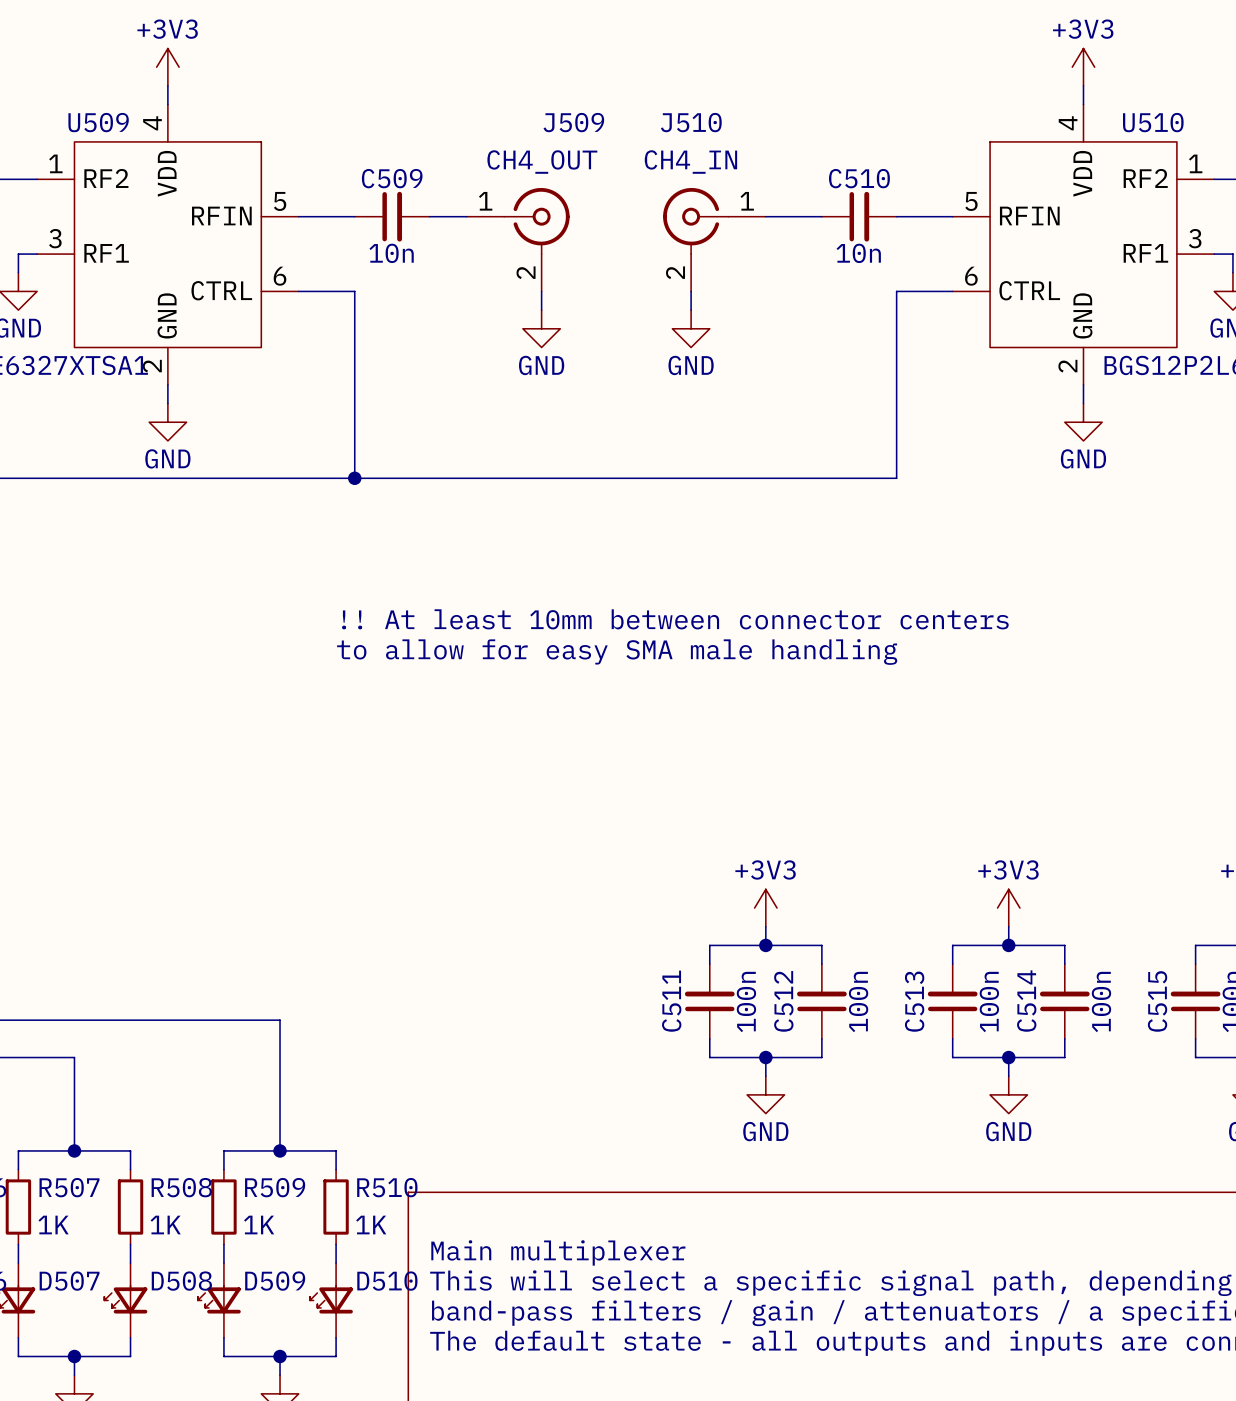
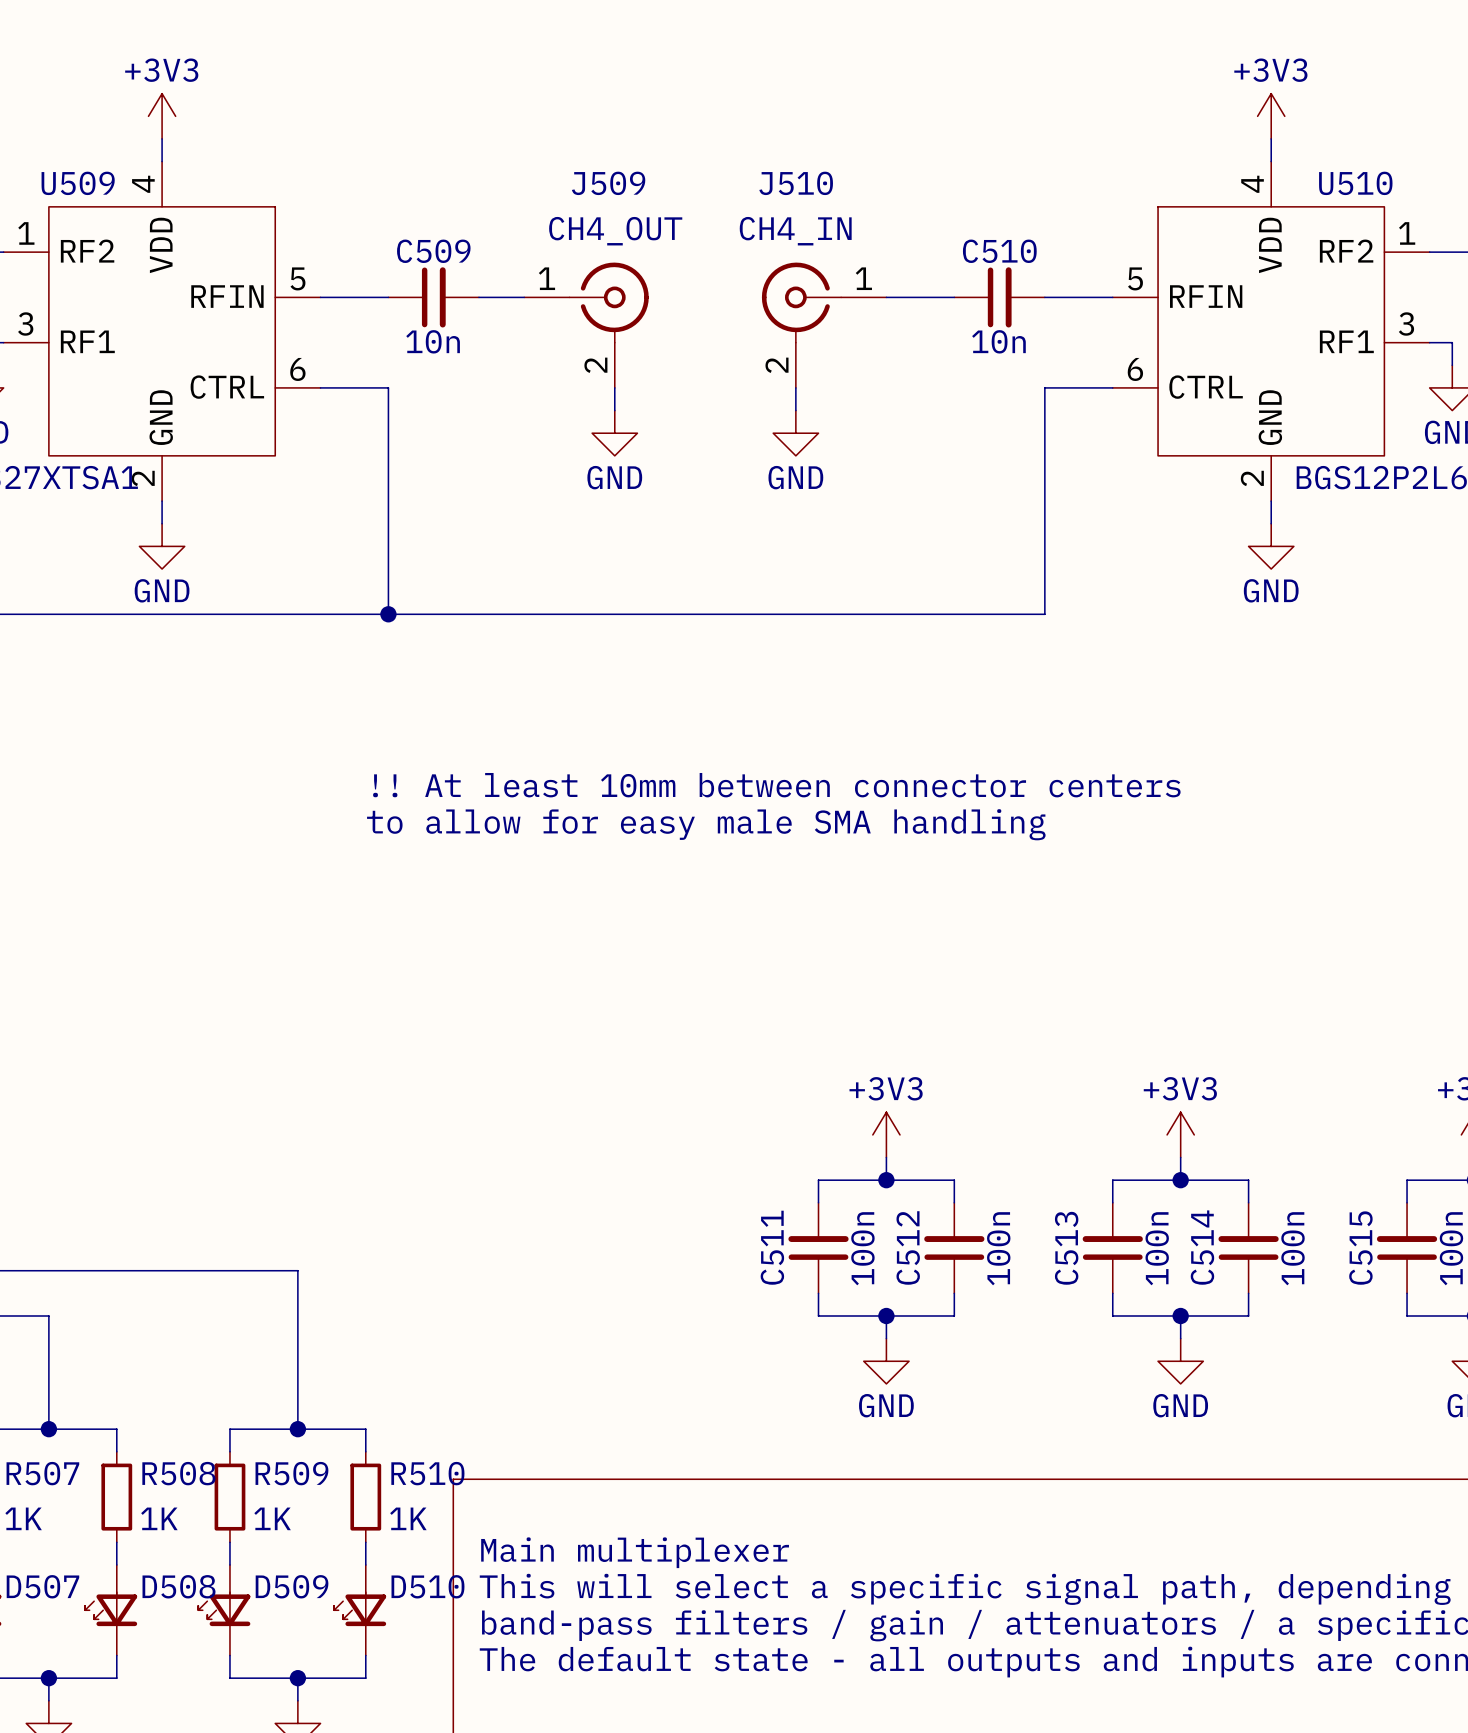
J509 name position: J509 (573, 122) -> J509 (608, 183)
text: to allow for easy SMA male handling (617, 652) -> to allow for easy male SMA handling (706, 824)

